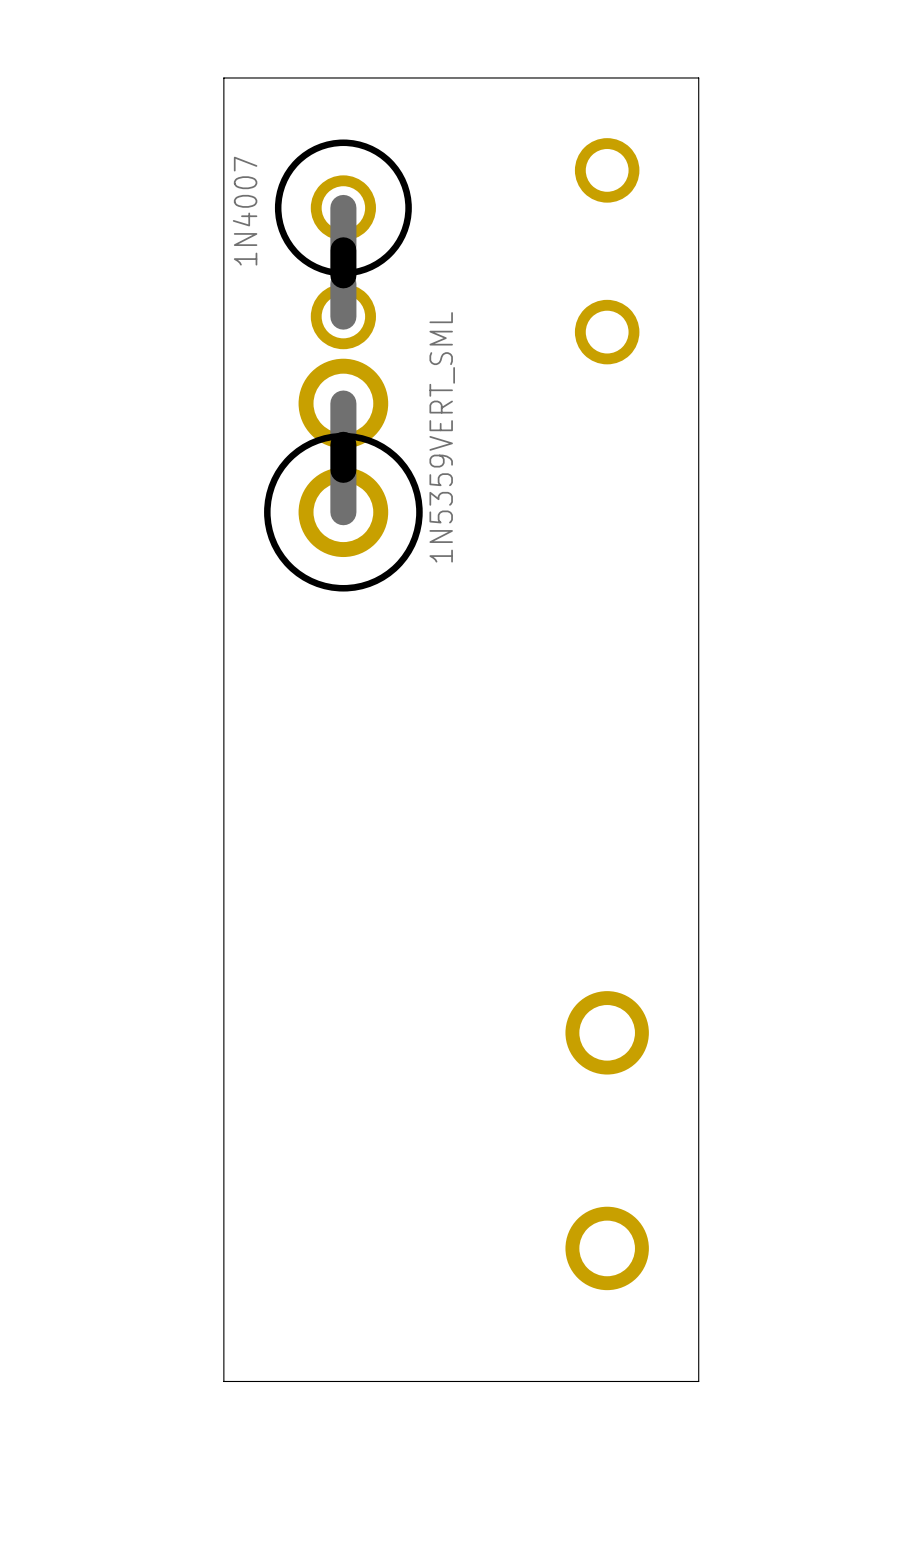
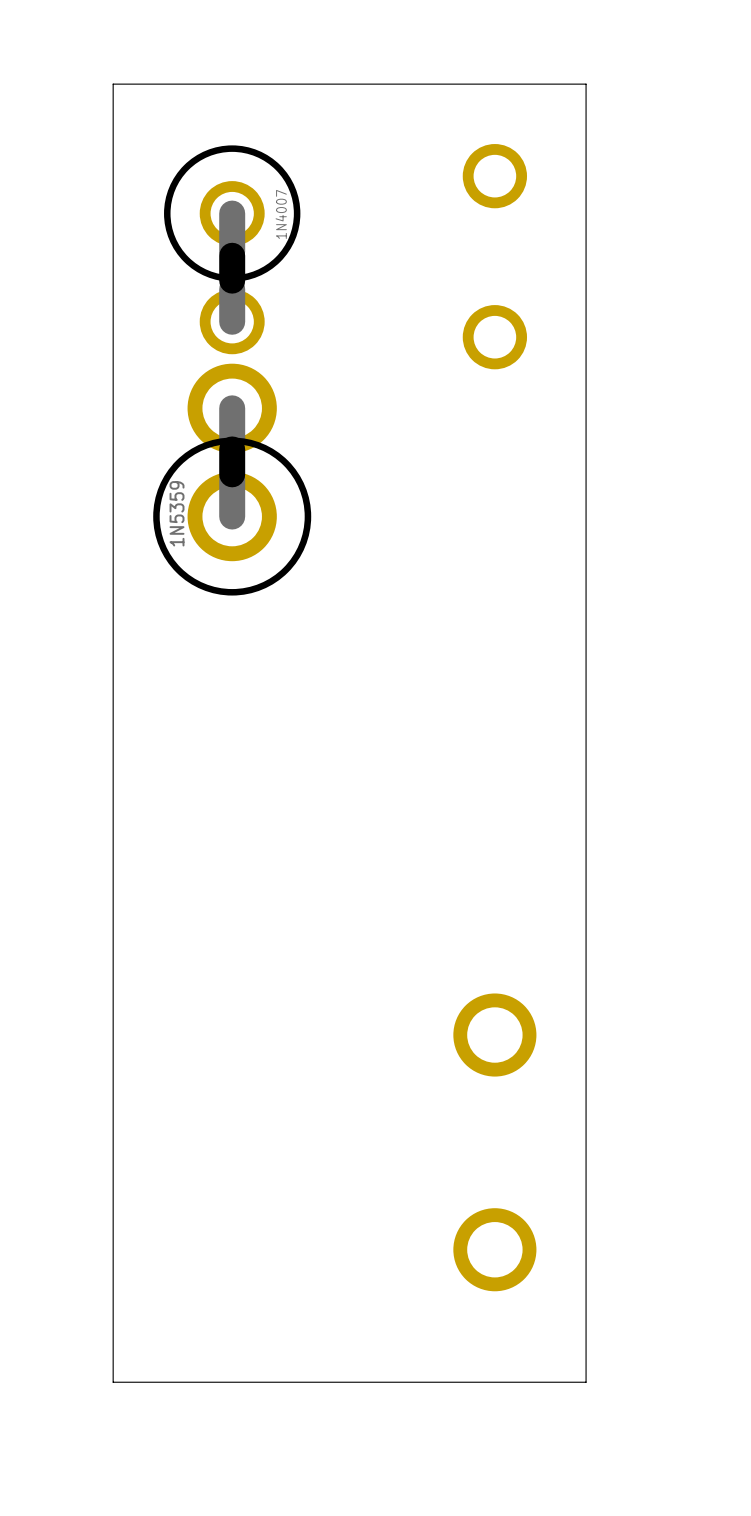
part text: none -> 1N4007 (281, 214)
part value: 1N4007 (245, 211) -> none
part value: 1N5359VERT_SML (442, 437) -> none
part text: none -> 1N5359 (177, 513)

